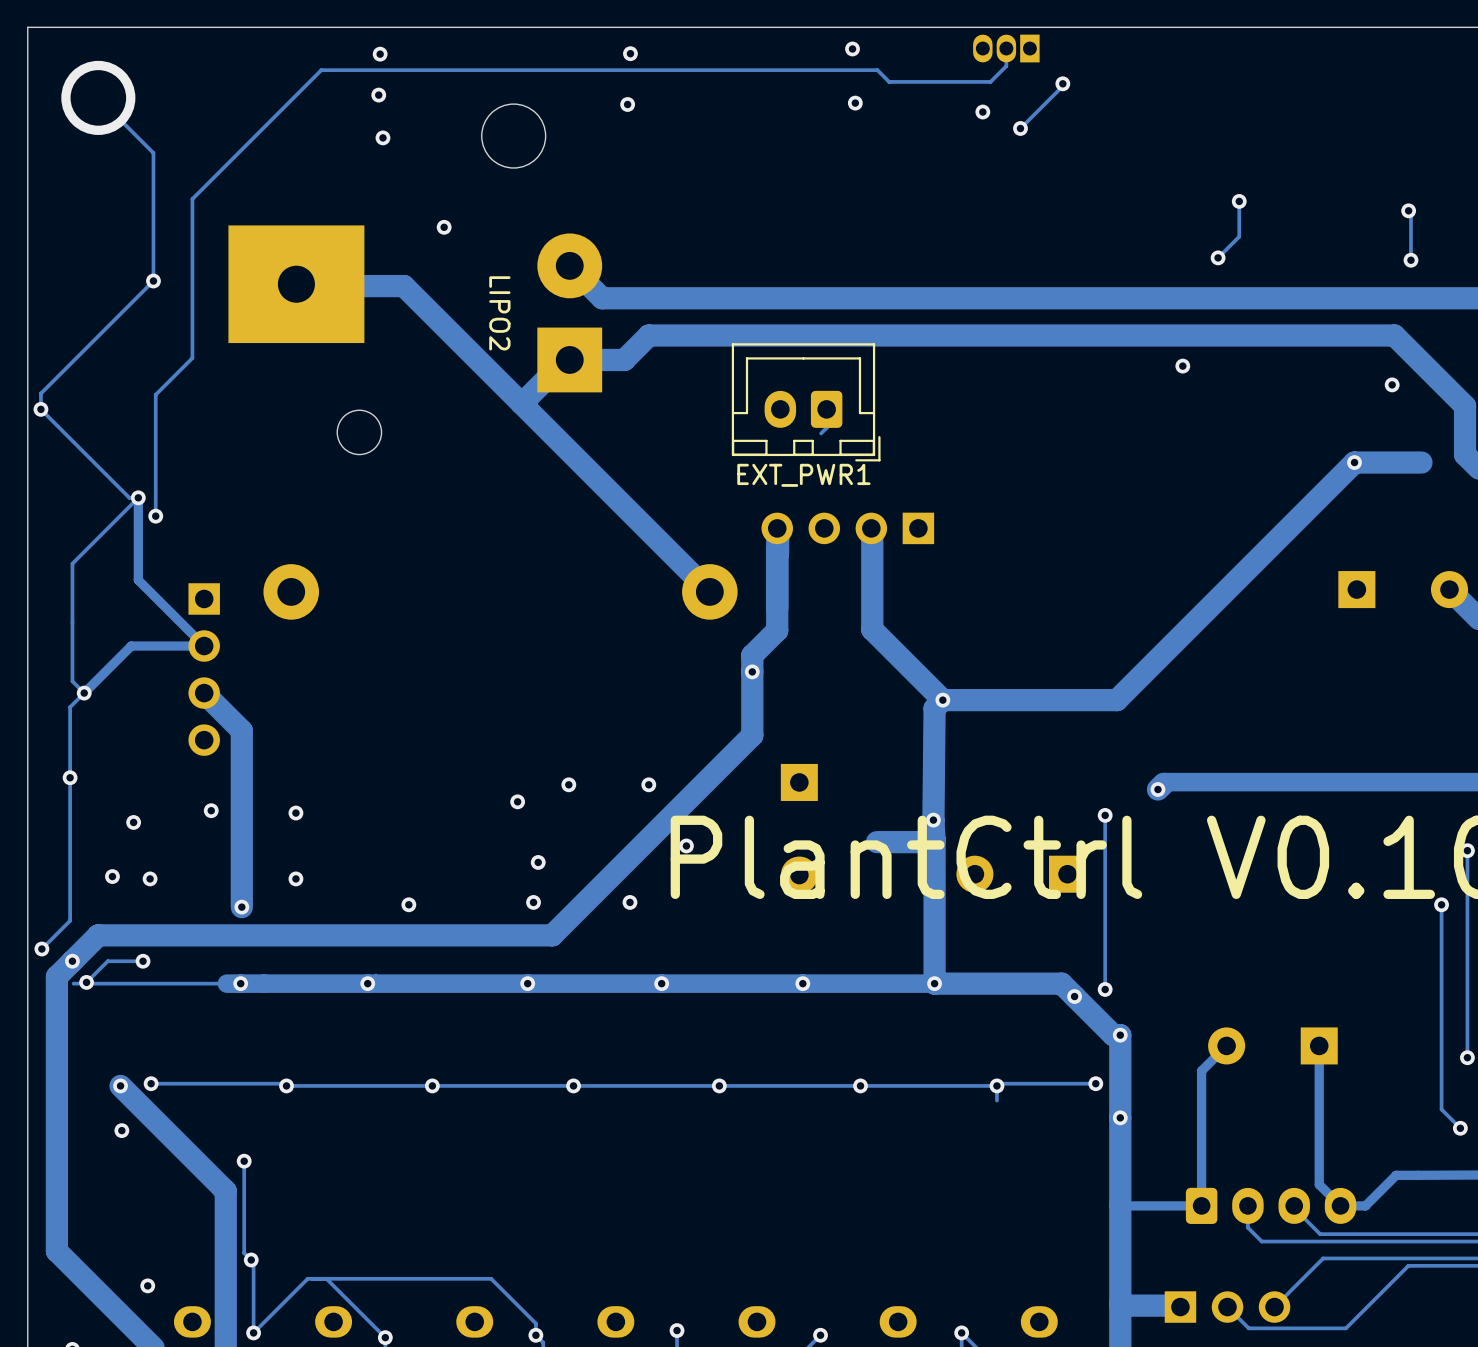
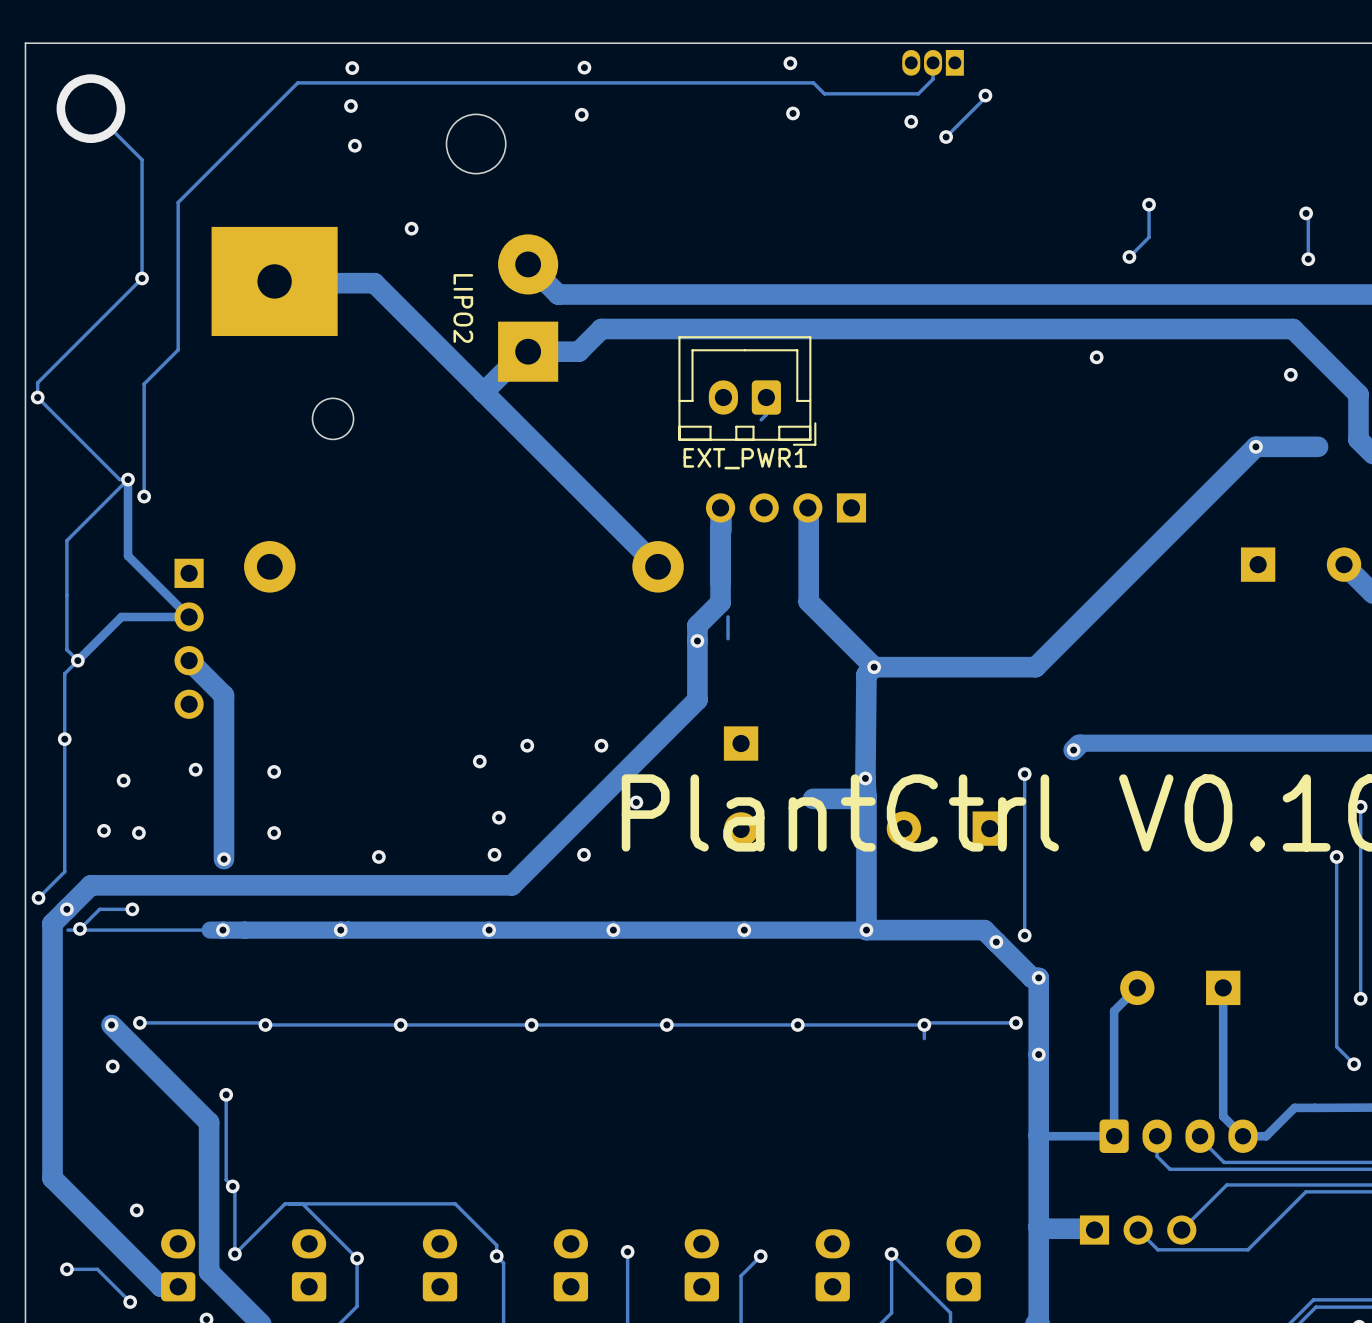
track: none -> (728, 616) (728, 638)

